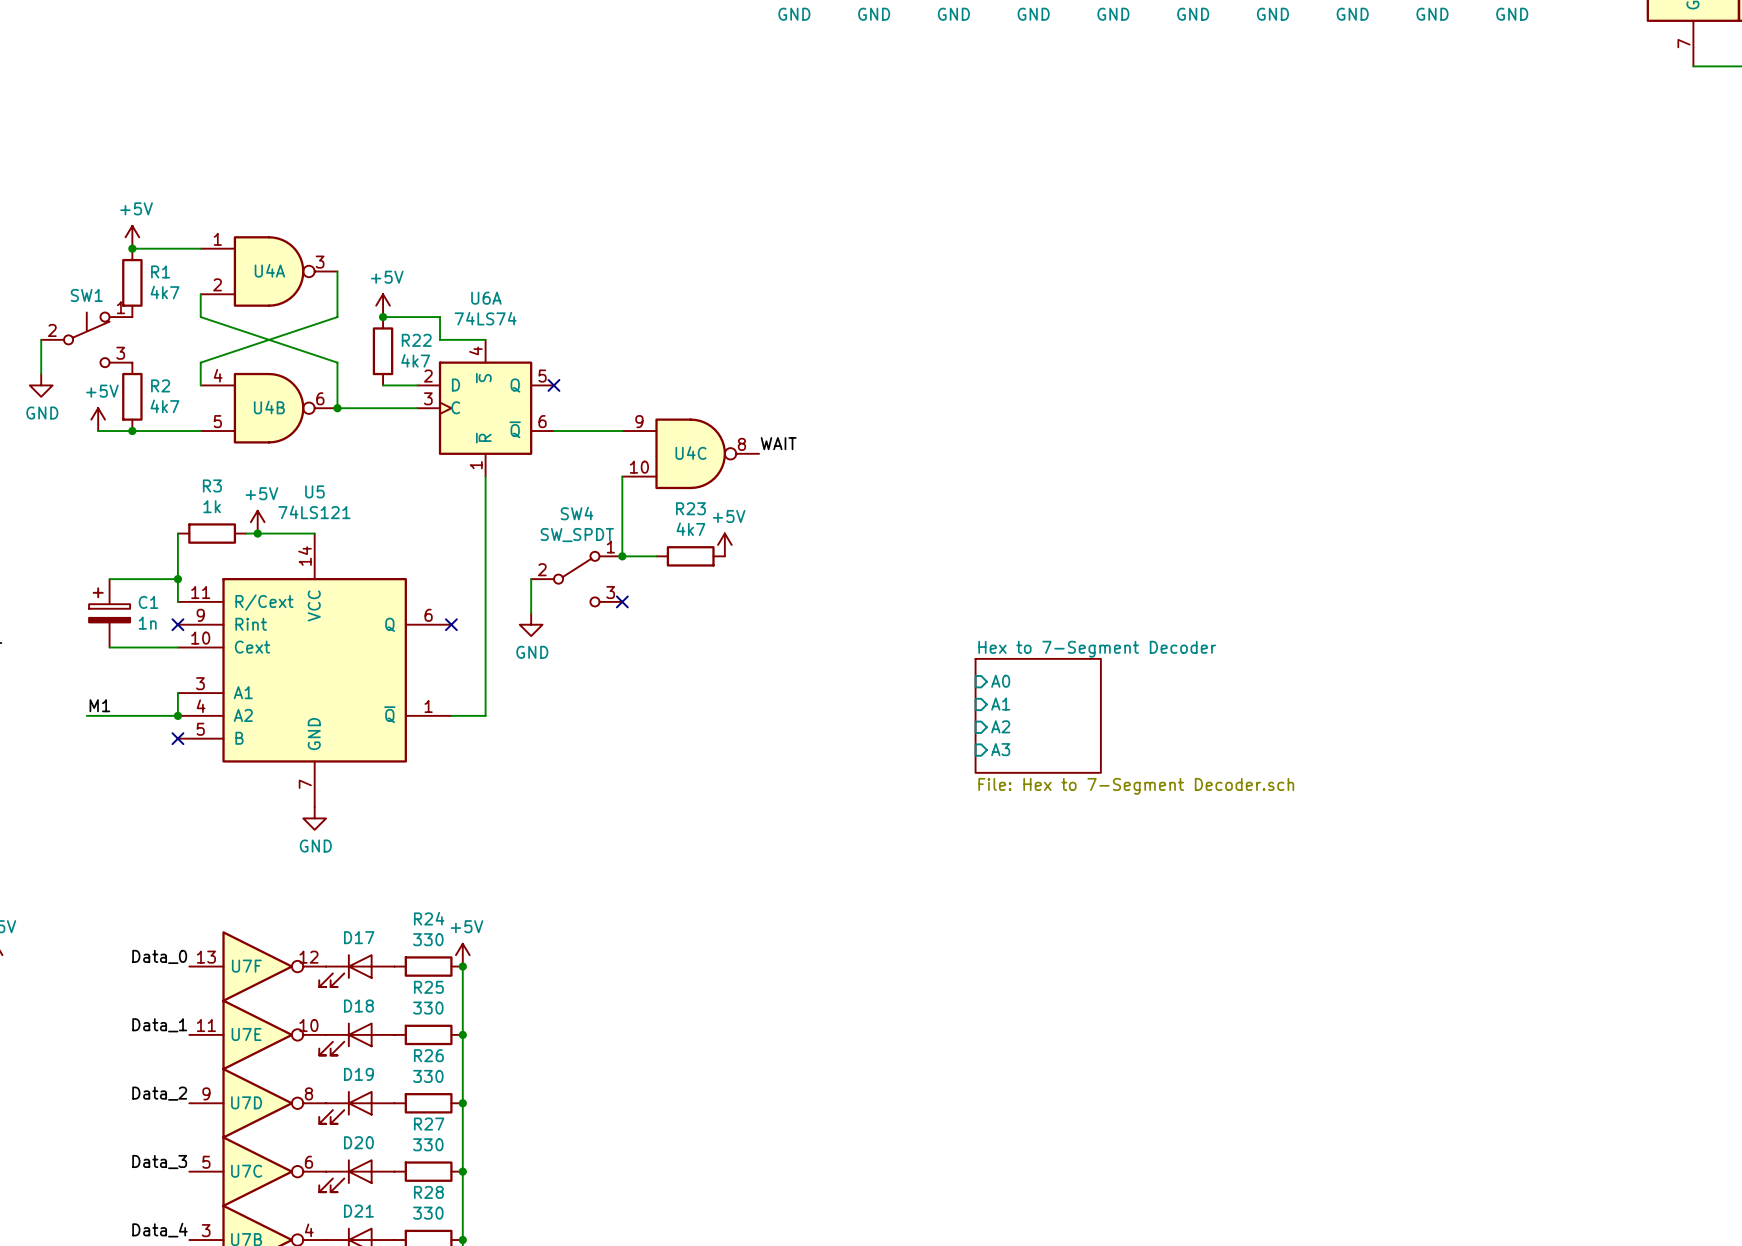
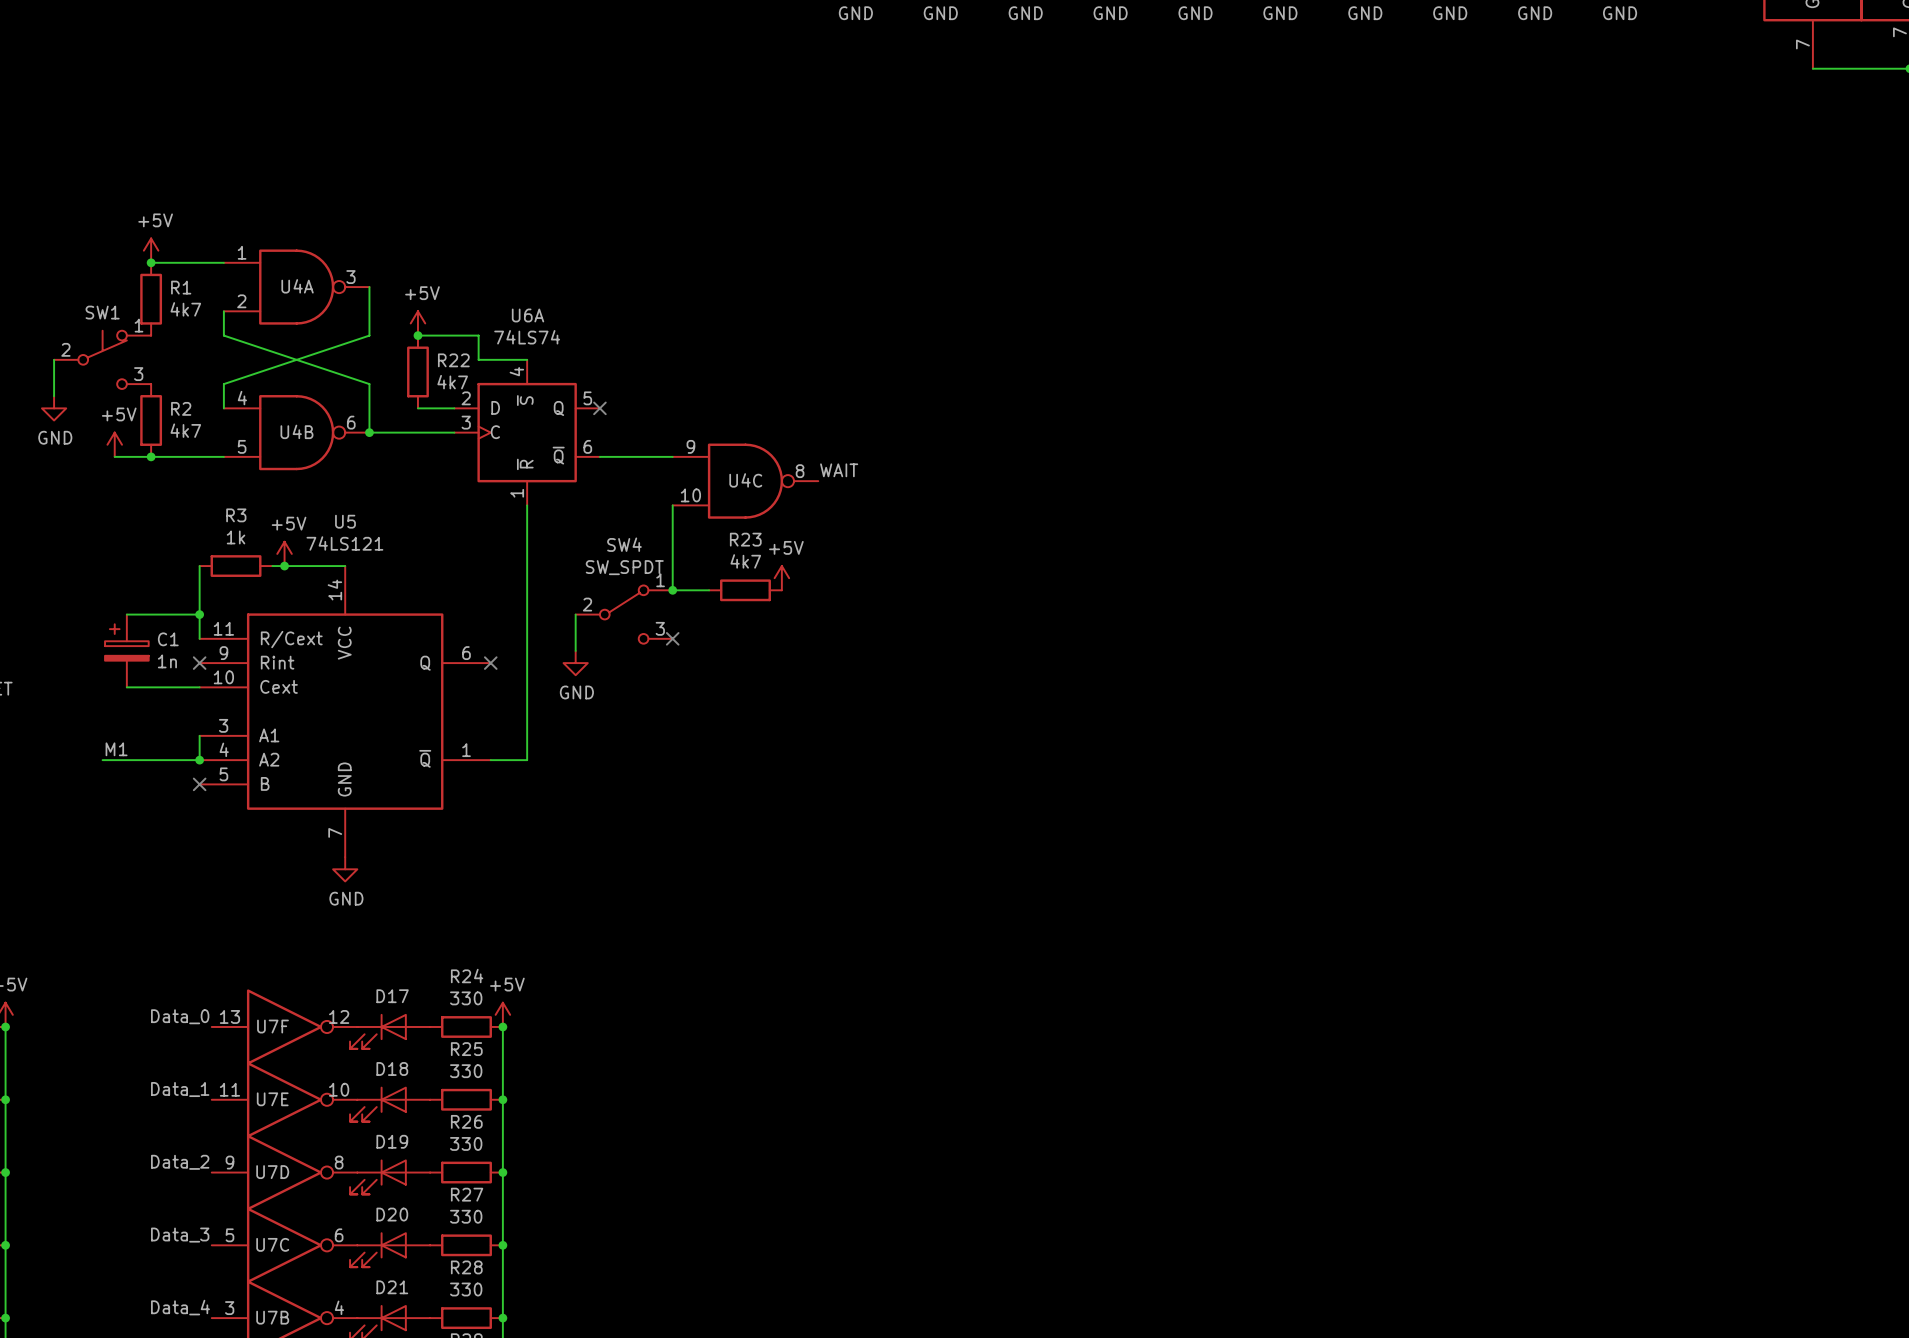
sheet pin: A0 (1000, 681) -> none
sheet pin: A1 (1000, 704) -> none
sheet Hex to 7-Segment Decoder: File: Hex to 7-Segment Decoder.sch (1038, 715) -> none
sheet pin: A2 (1000, 726) -> none
sheet pin: A3 (1000, 749) -> none

